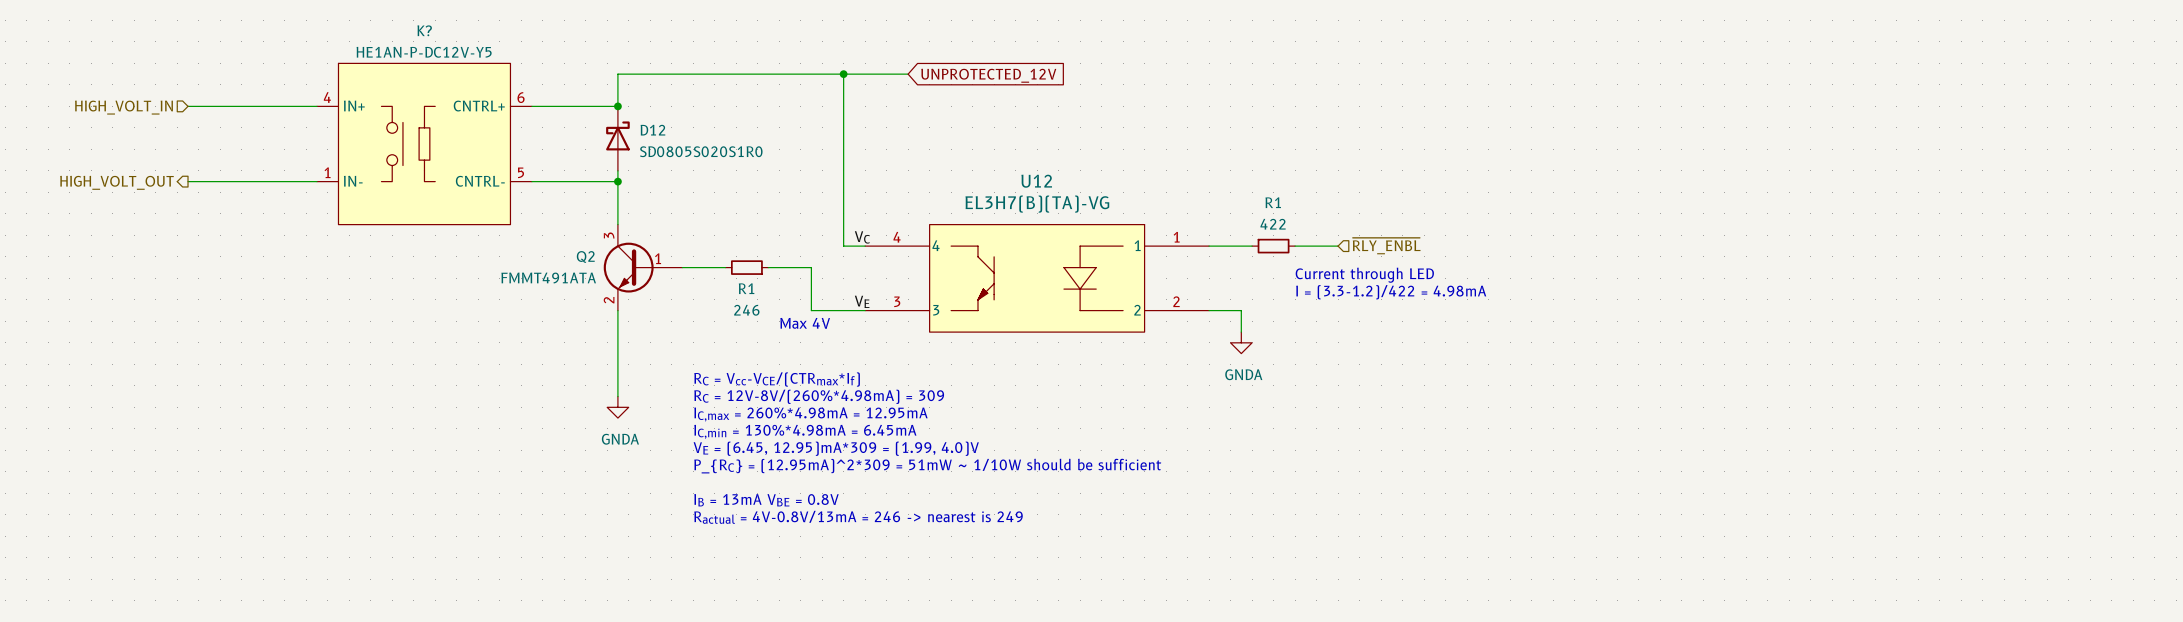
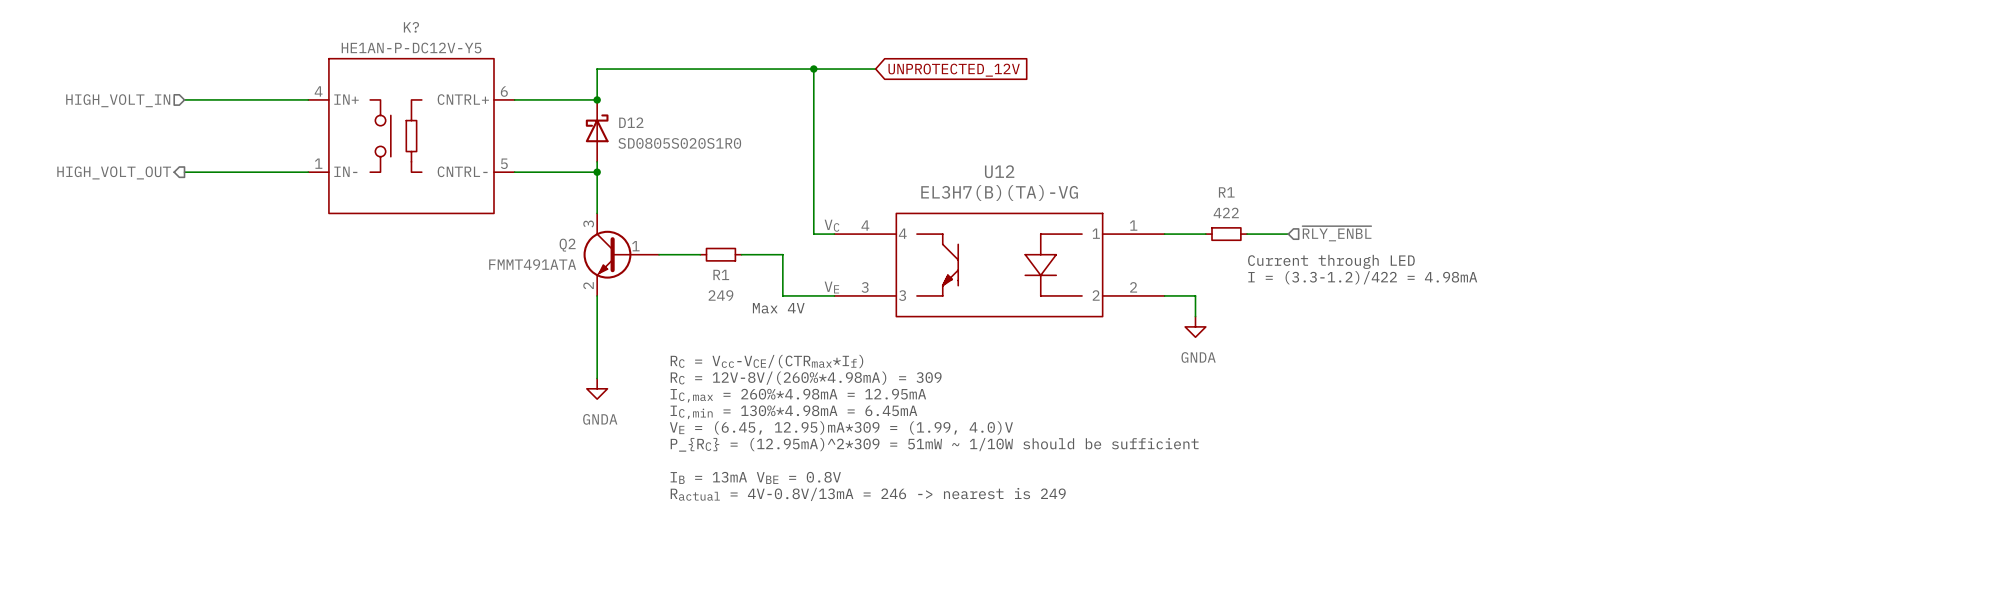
R1 value: 246 (746, 310) -> 249 (720, 295)

